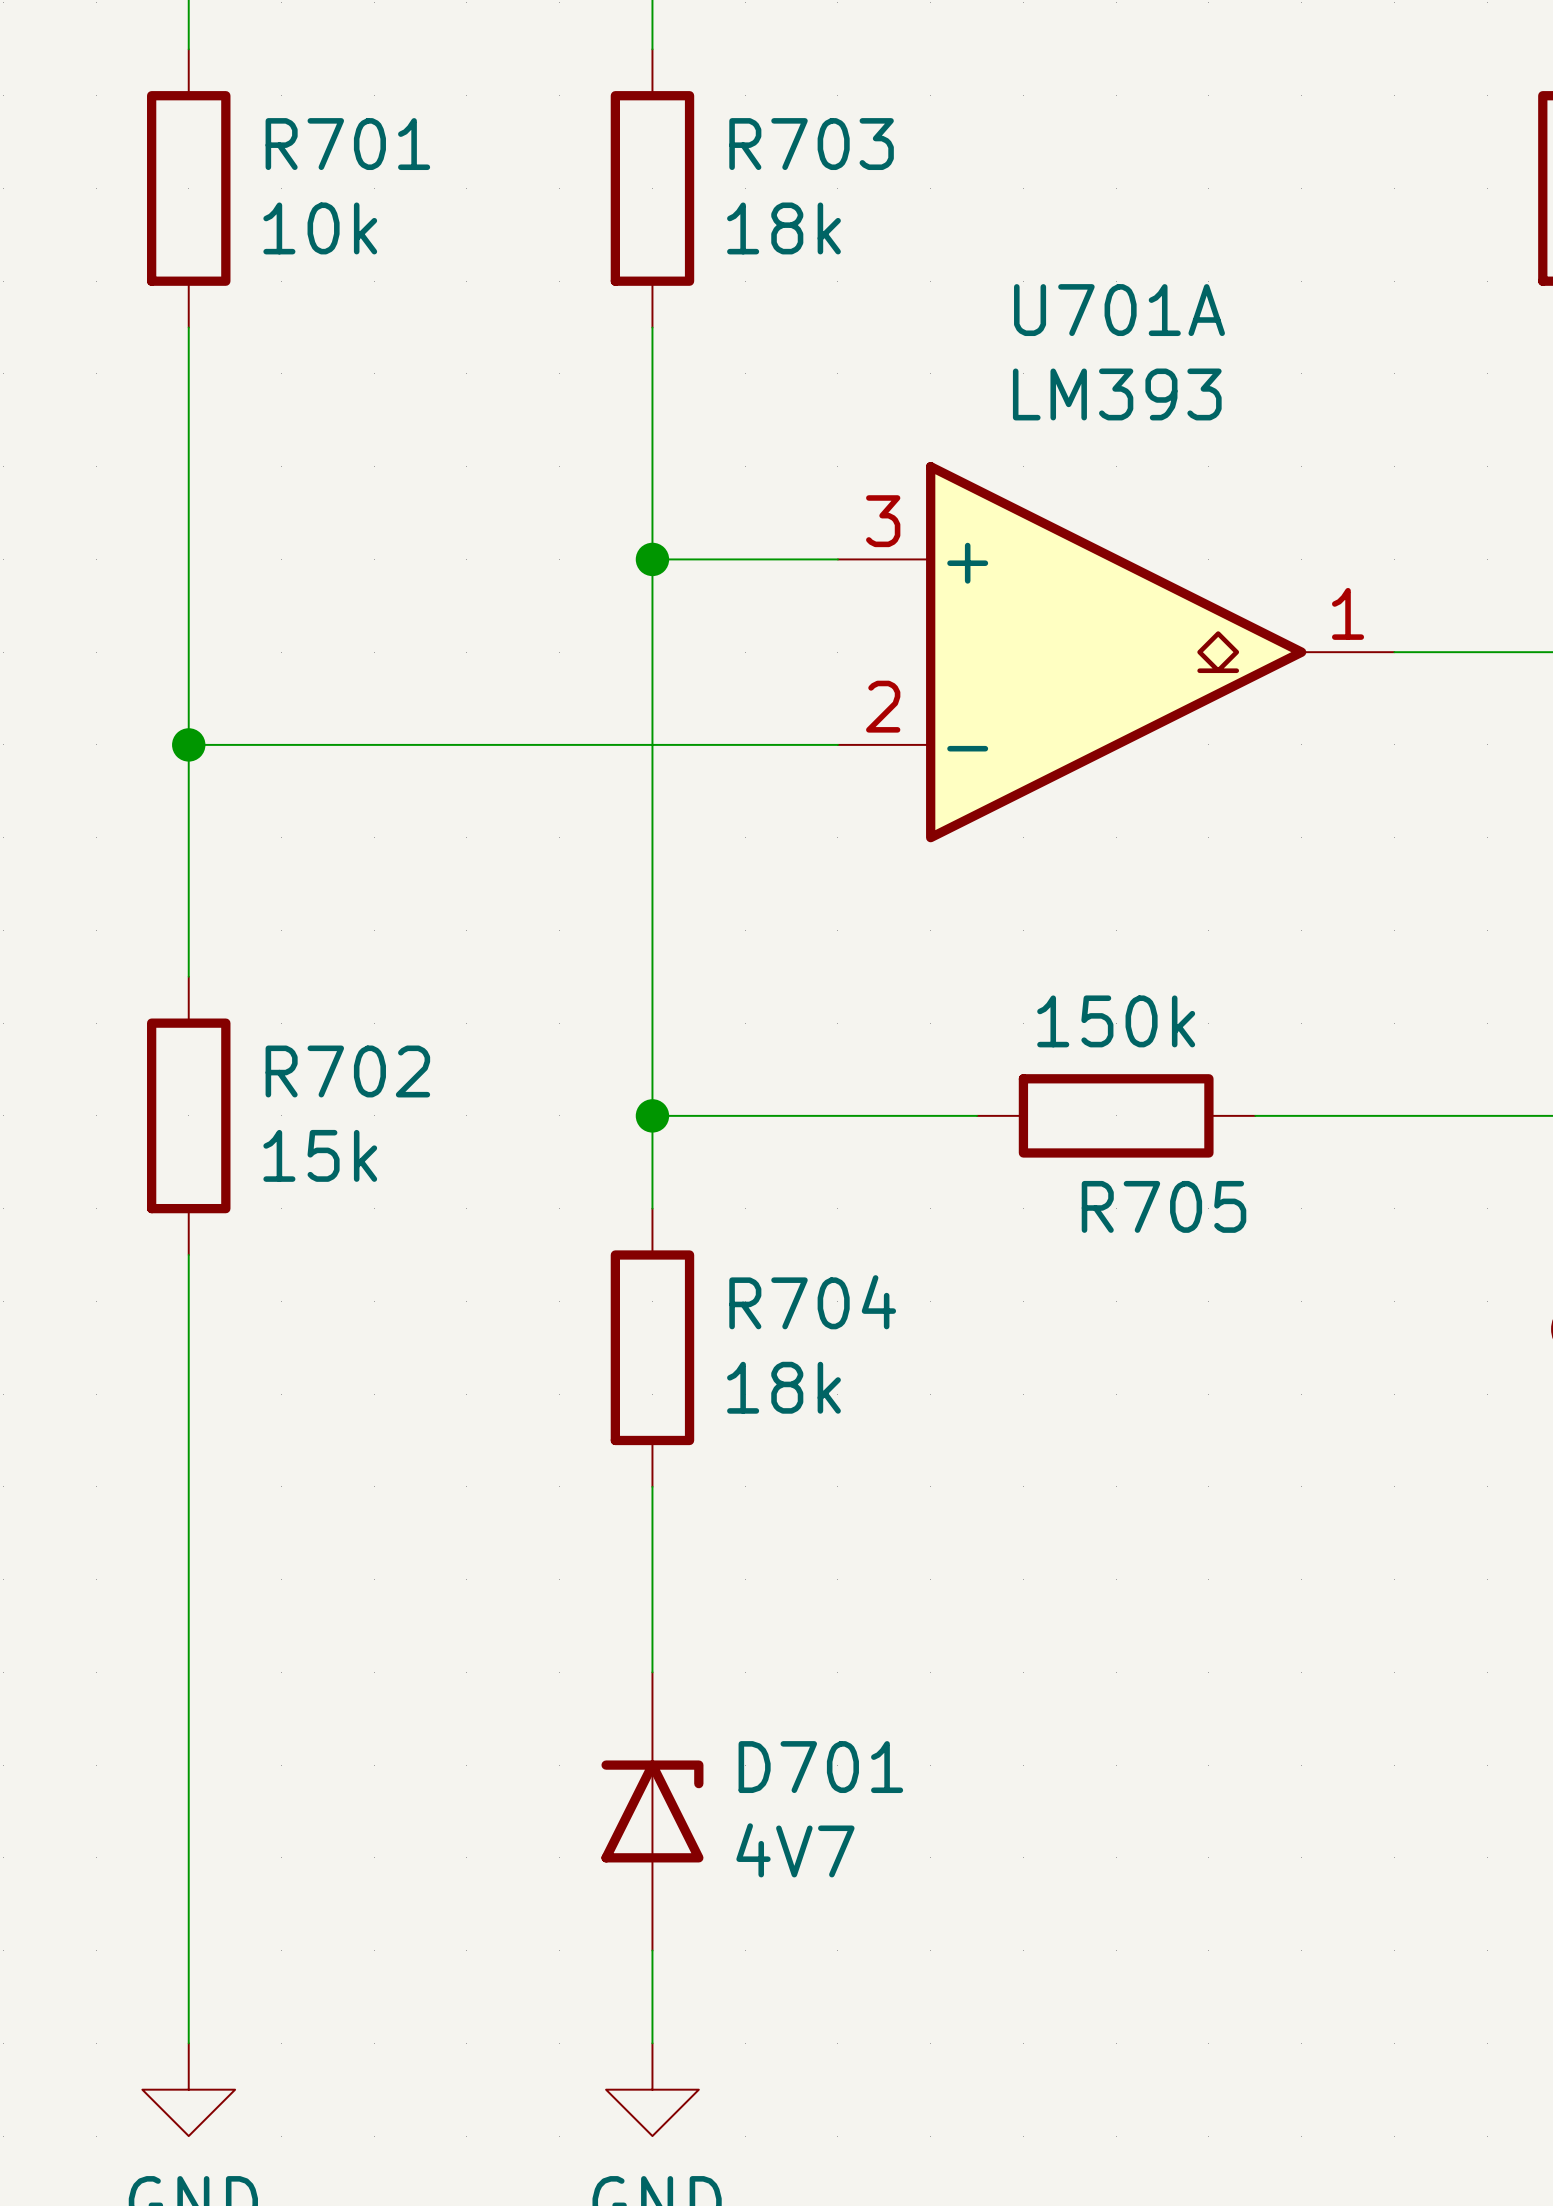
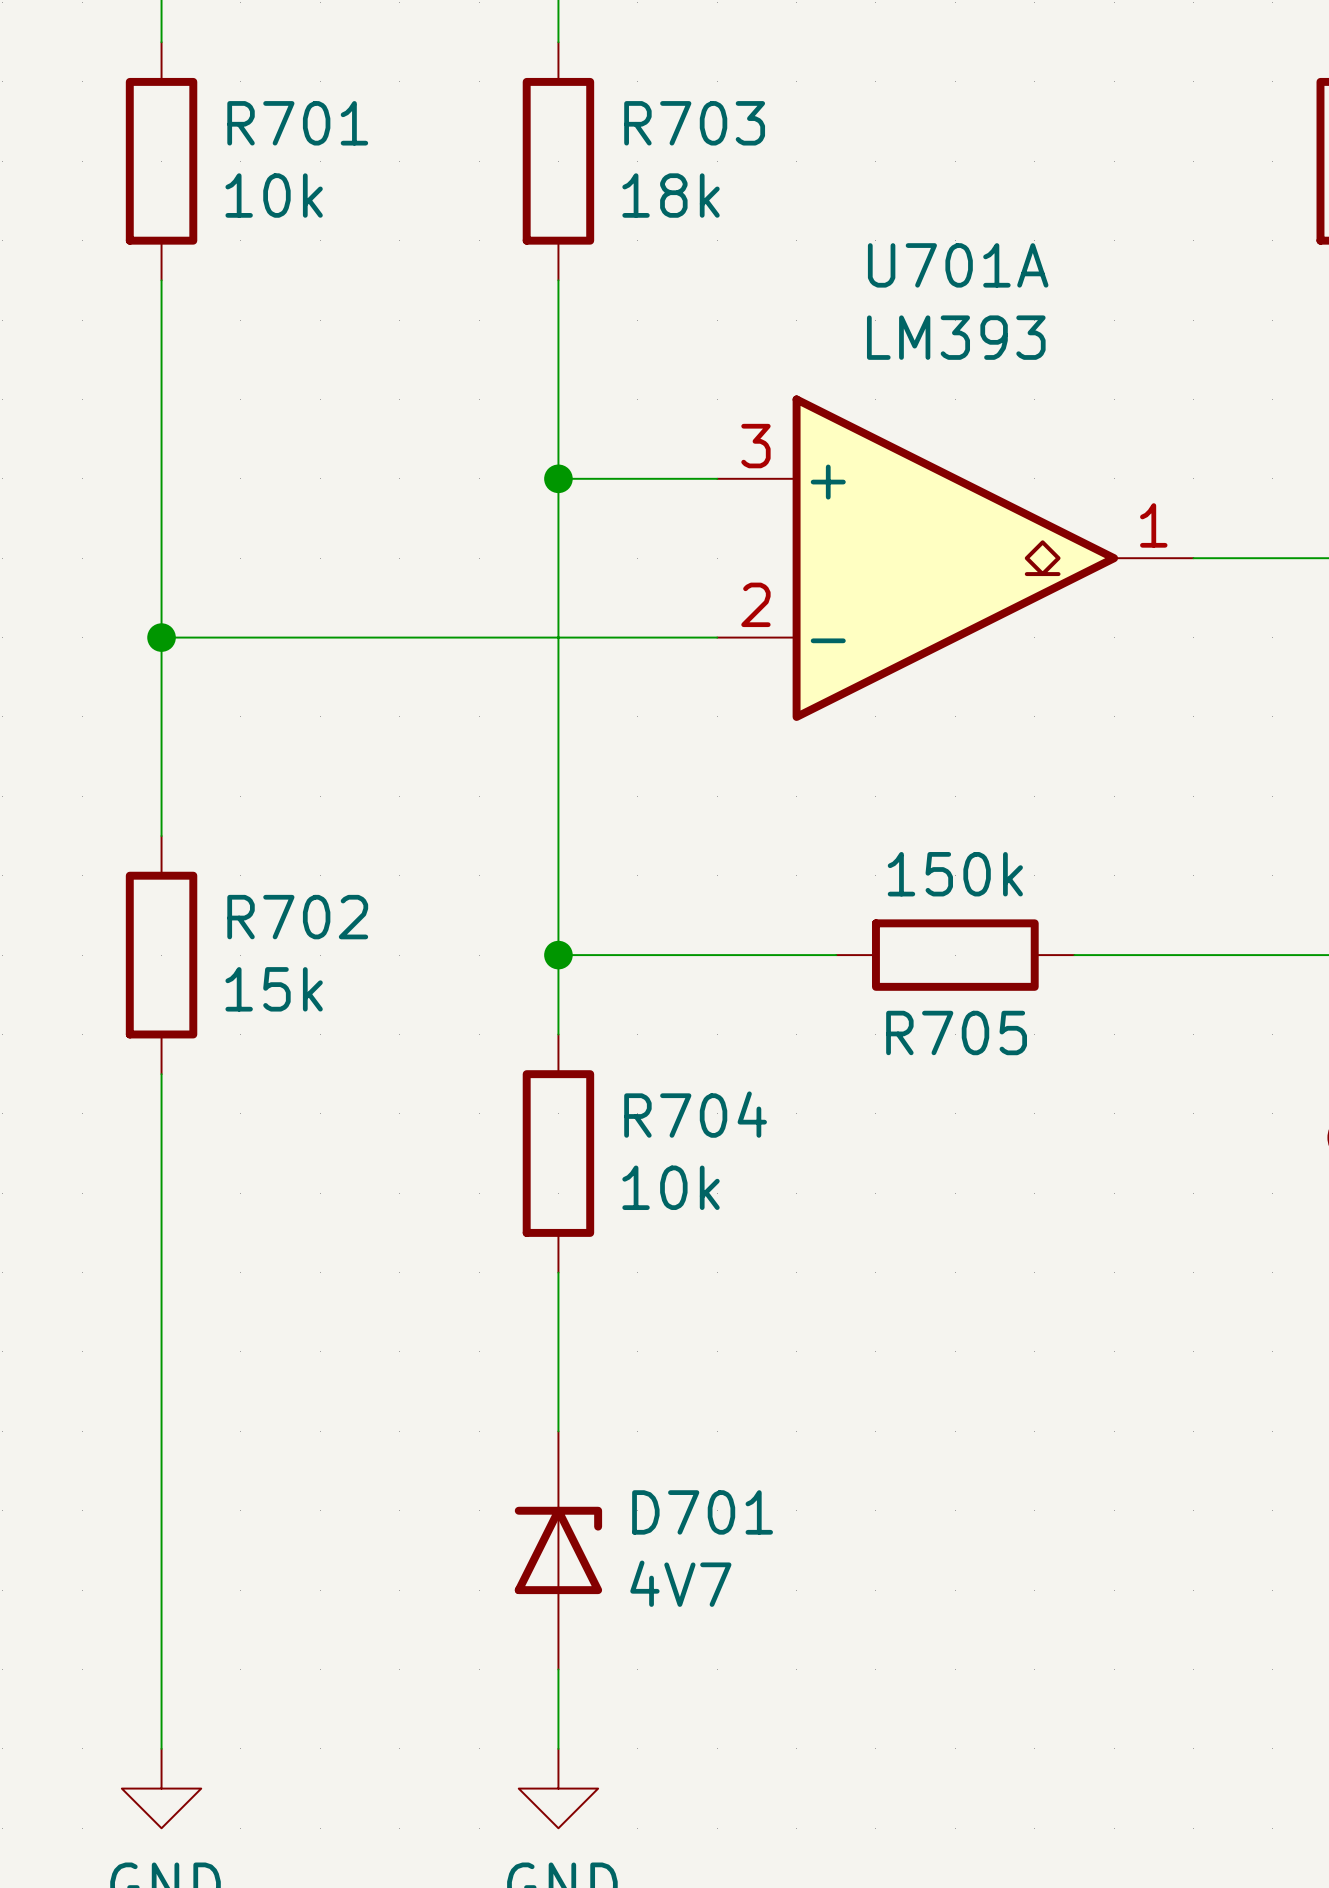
R705 name position: R705 (1163, 1206) -> R705 (956, 1032)
R704 value: 18k (783, 1387) -> 10k (671, 1187)

